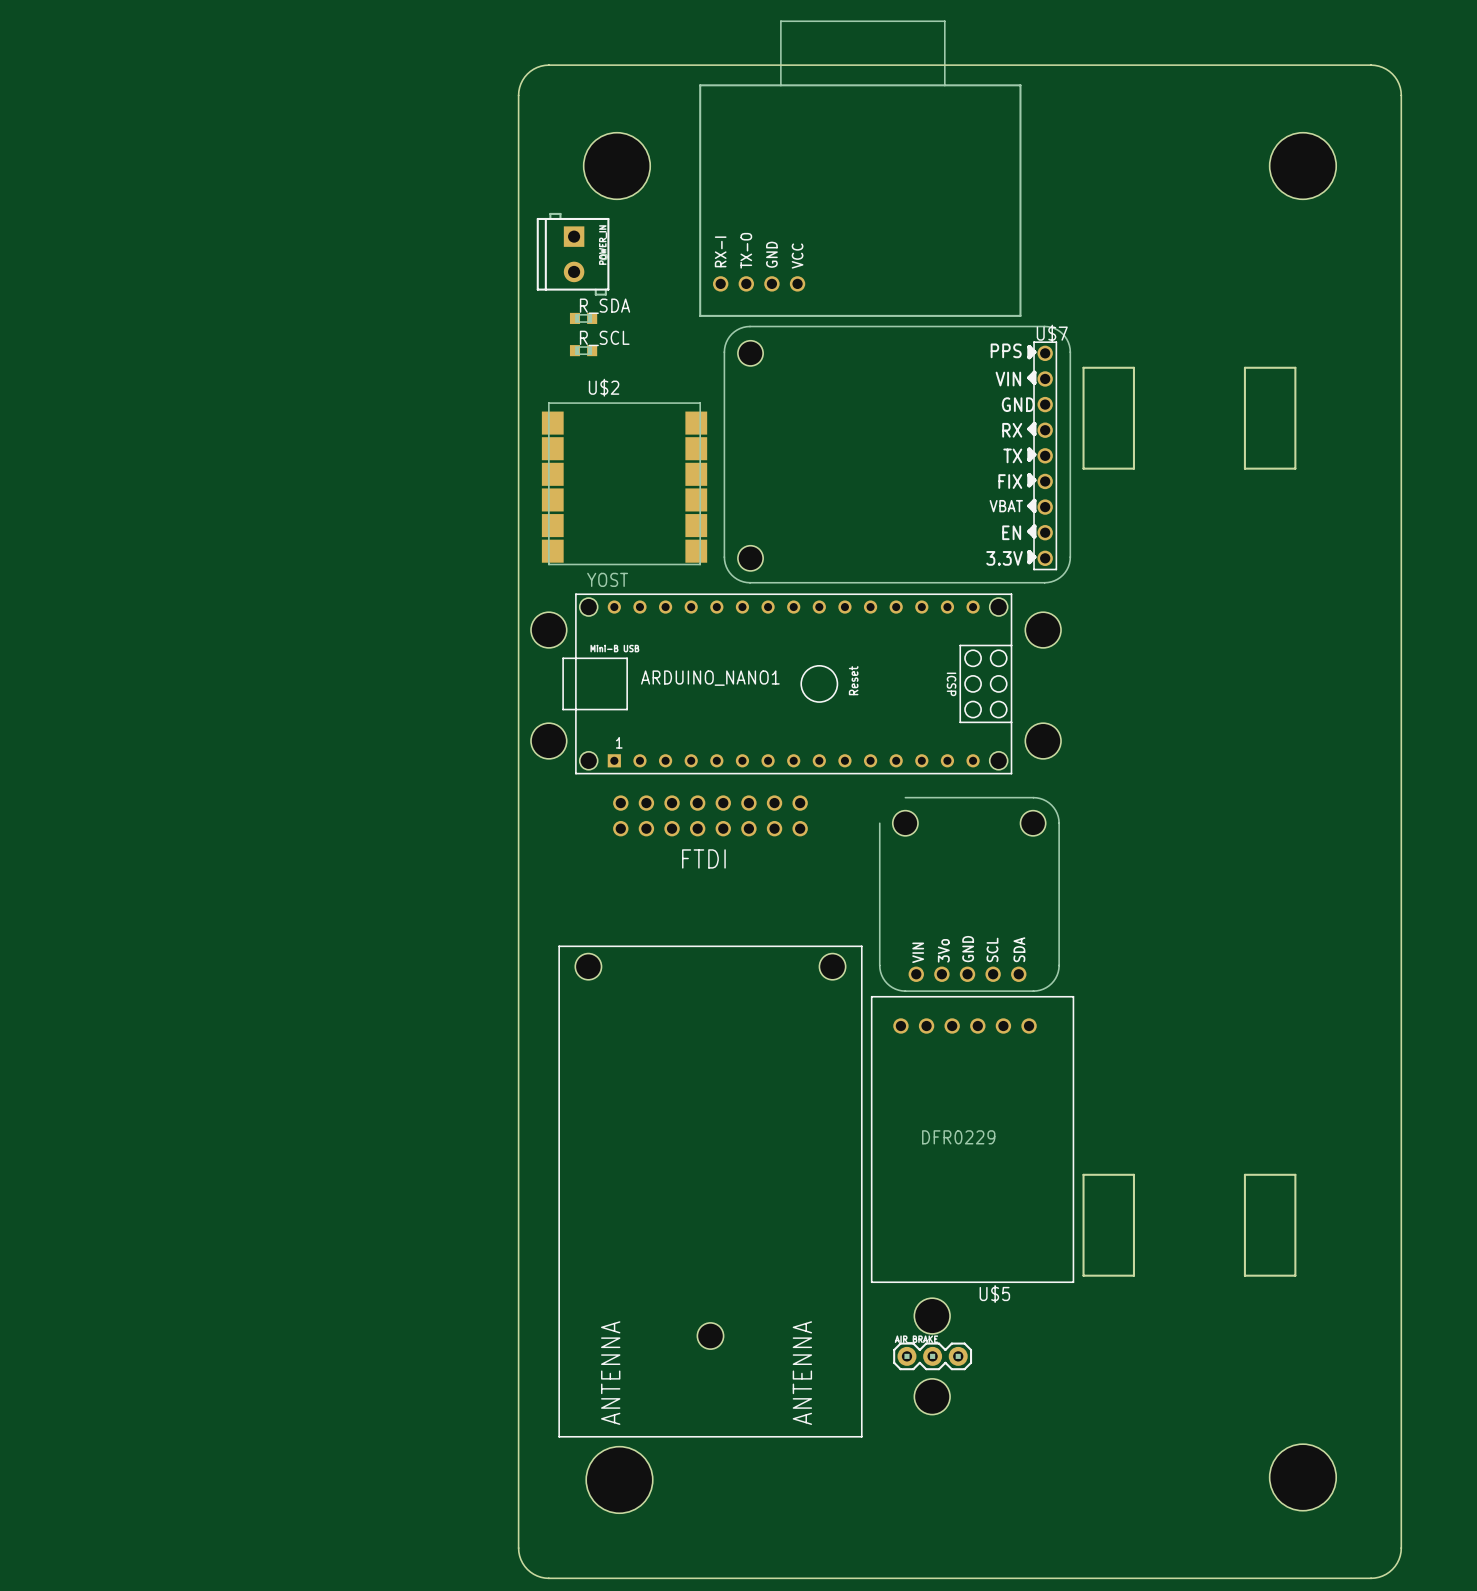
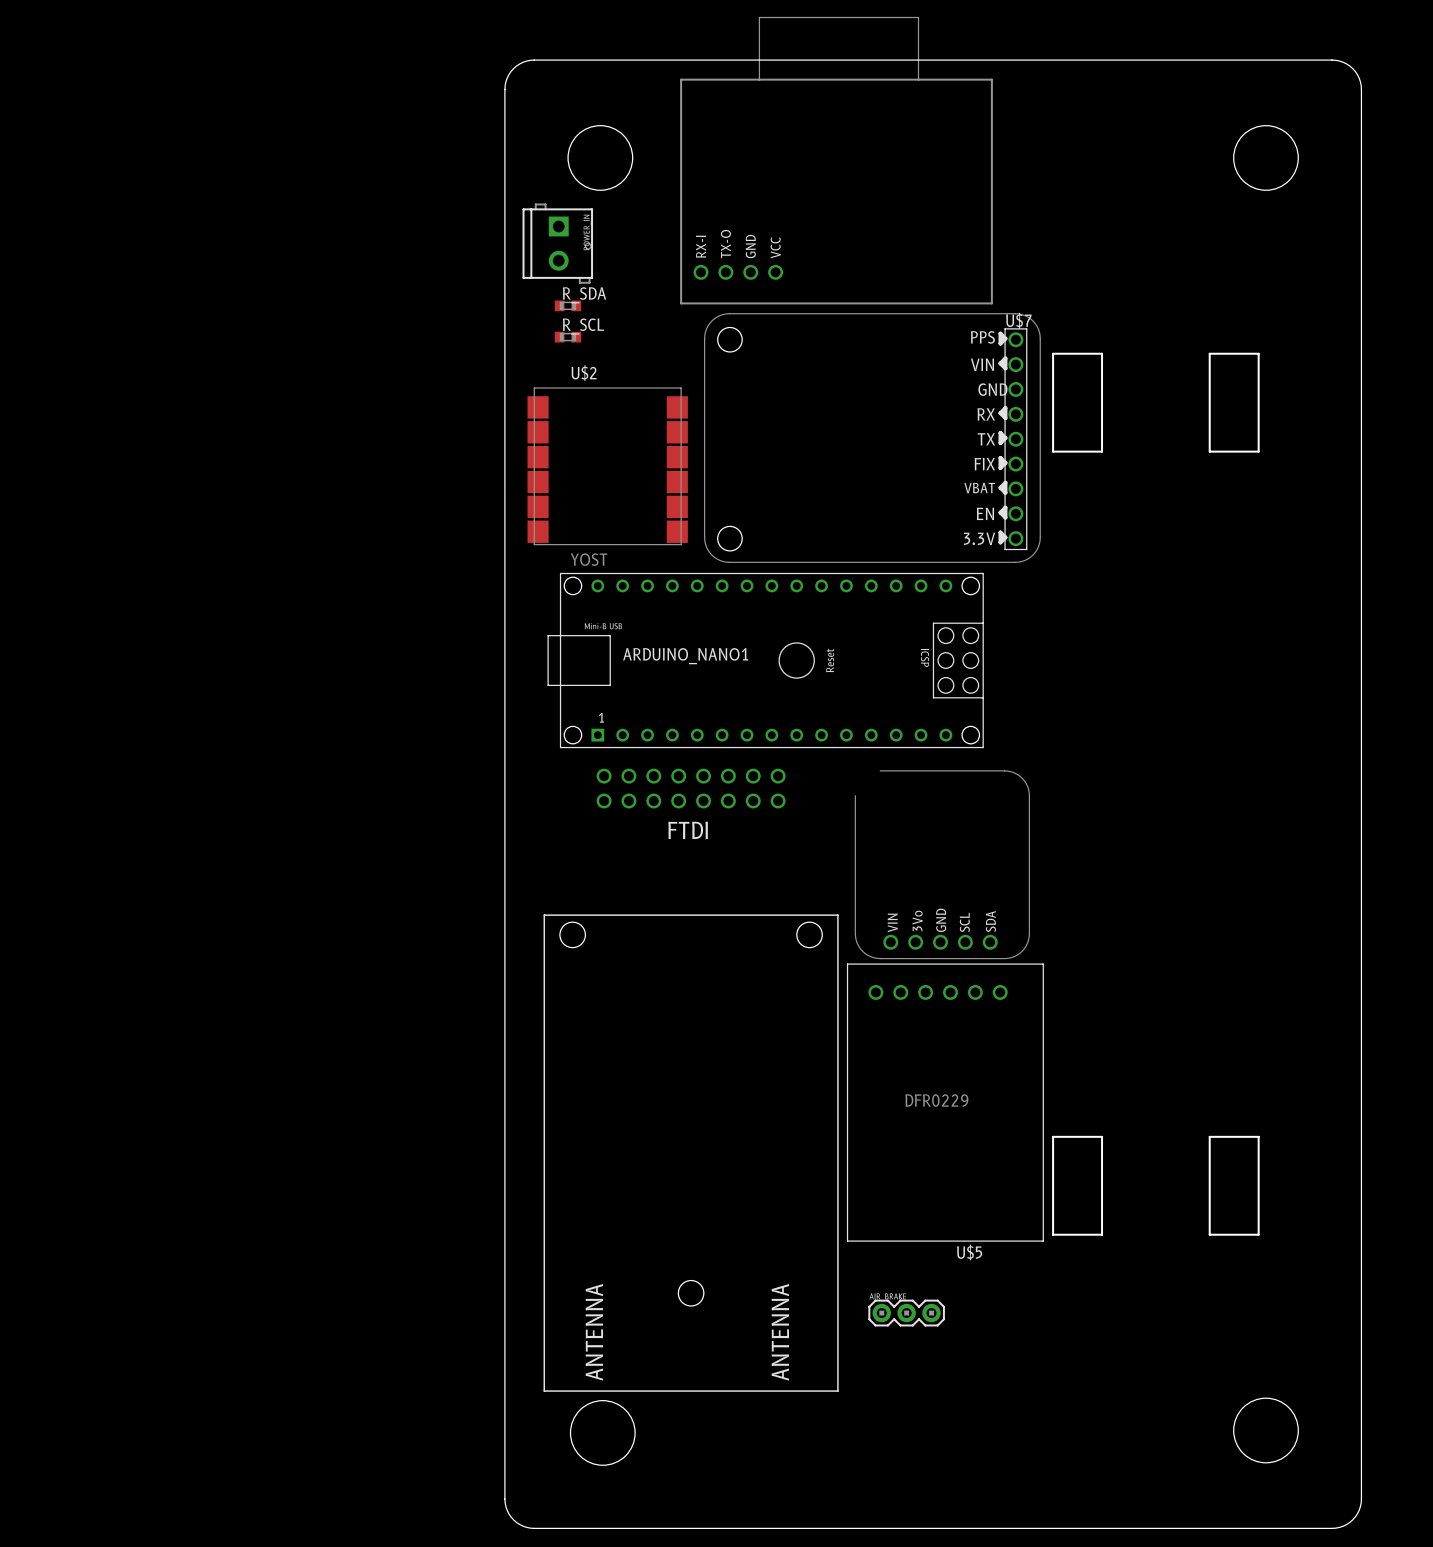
hole: (548, 630) -> none
hole: (1043, 630) -> none
hole: (548, 741) -> none
hole: (1043, 741) -> none
part footprint: [879, 797, 1060, 992] -> [855, 770, 1030, 959]
hole: (932, 1316) -> none
hole: (932, 1396) -> none

